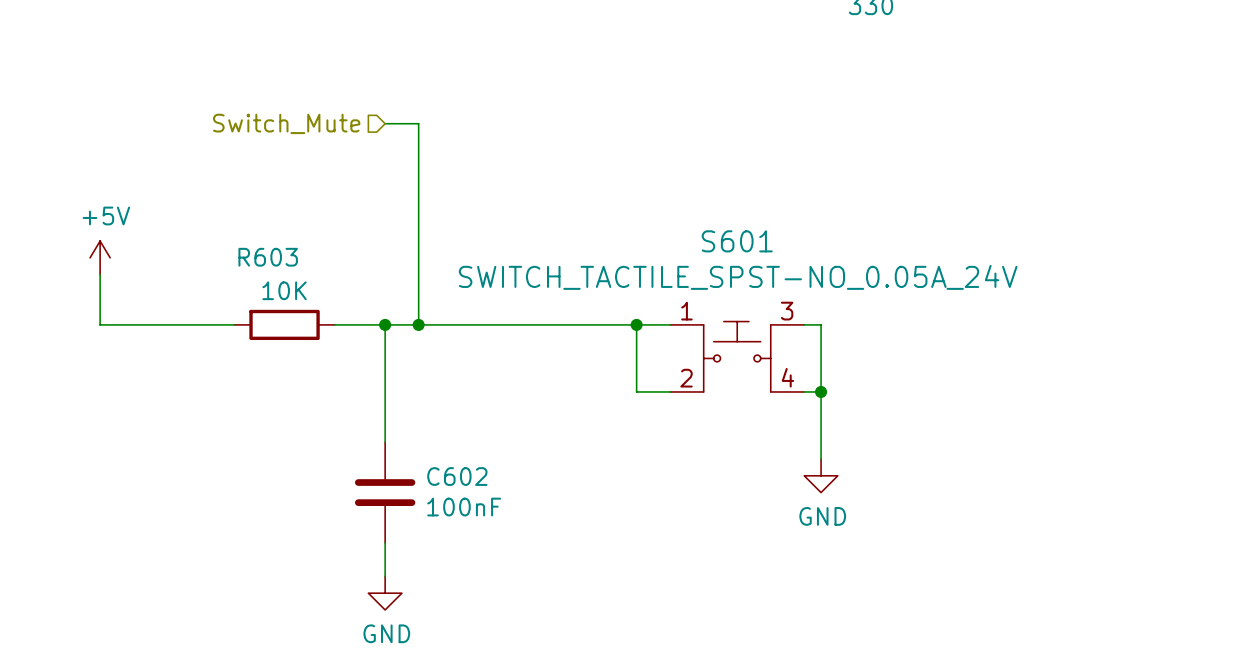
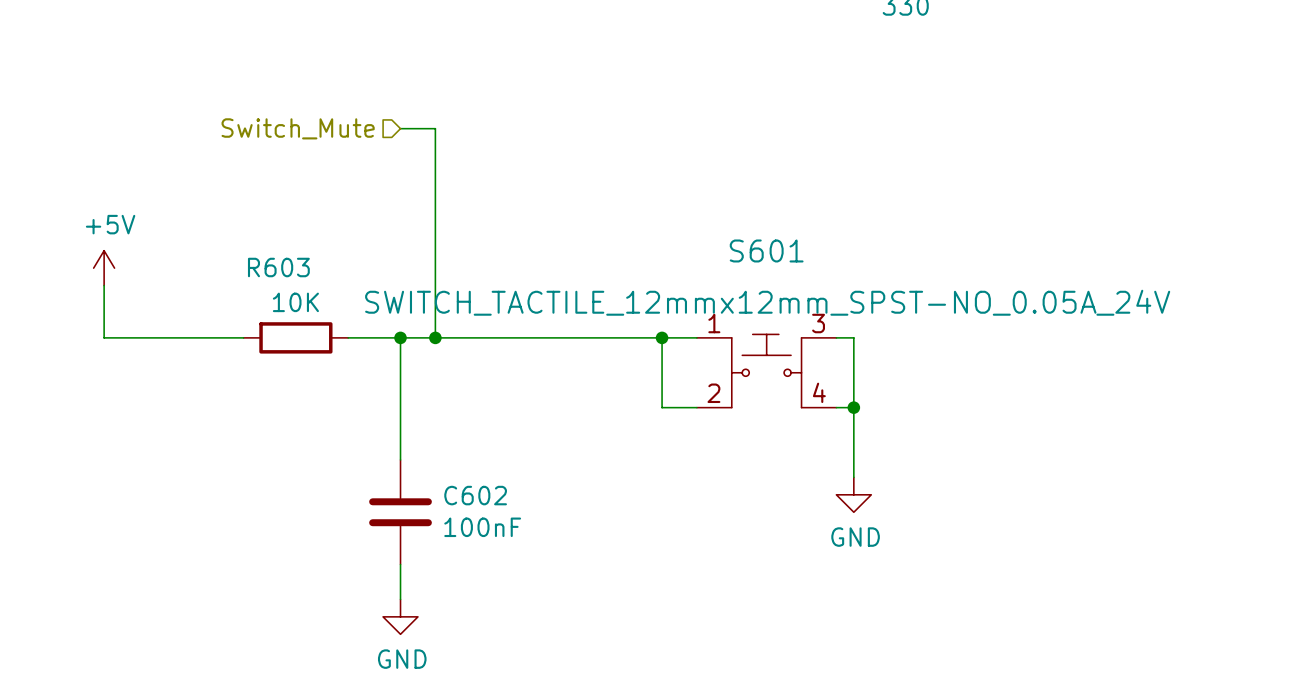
S601 value: SWITCH_TACTILE_SPST-NO_0.05A_24V (738, 277) -> SWITCH_TACTILE_12mmx12mm_SPST-NO_0.05A_24V (767, 302)

